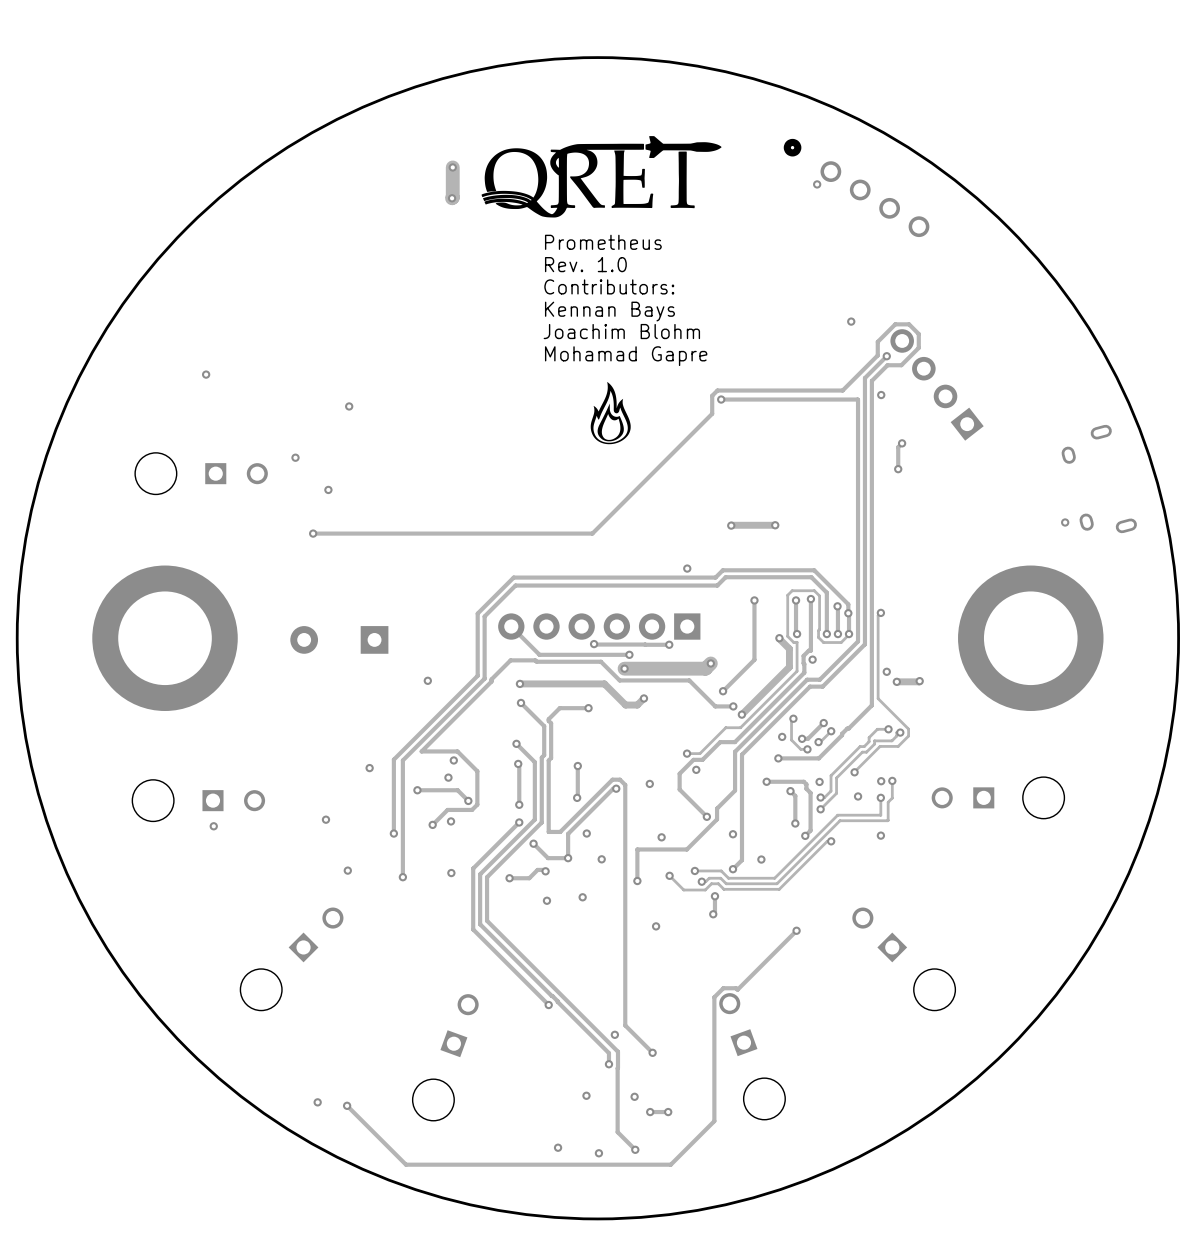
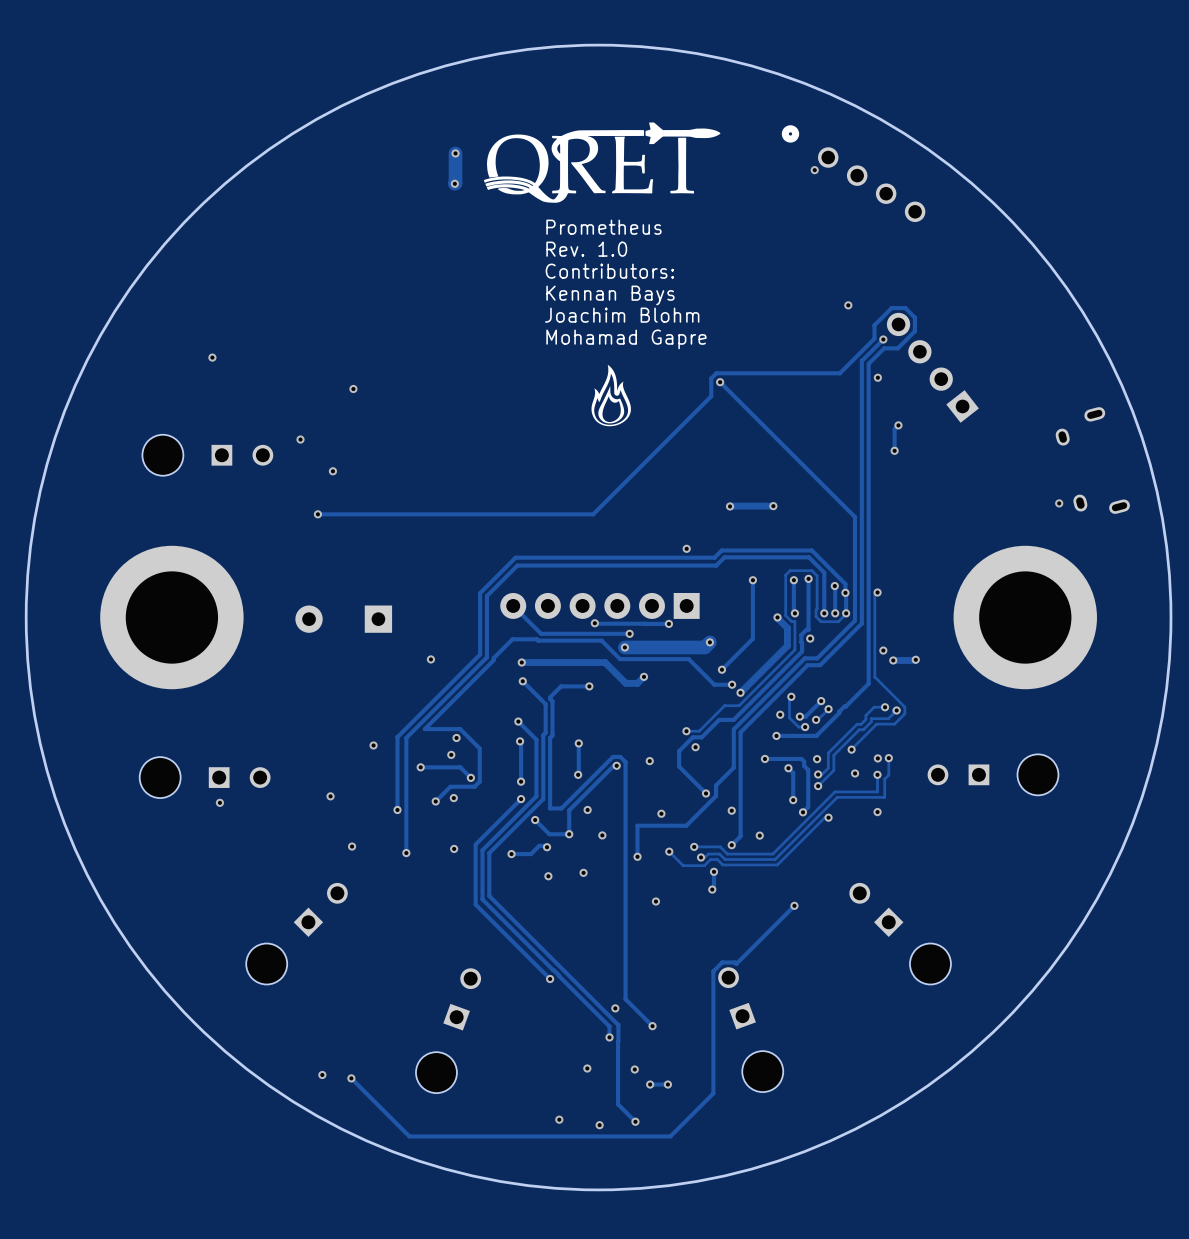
track: (721, 399) (857, 399) (858, 536) -> (720, 382) (855, 517)

